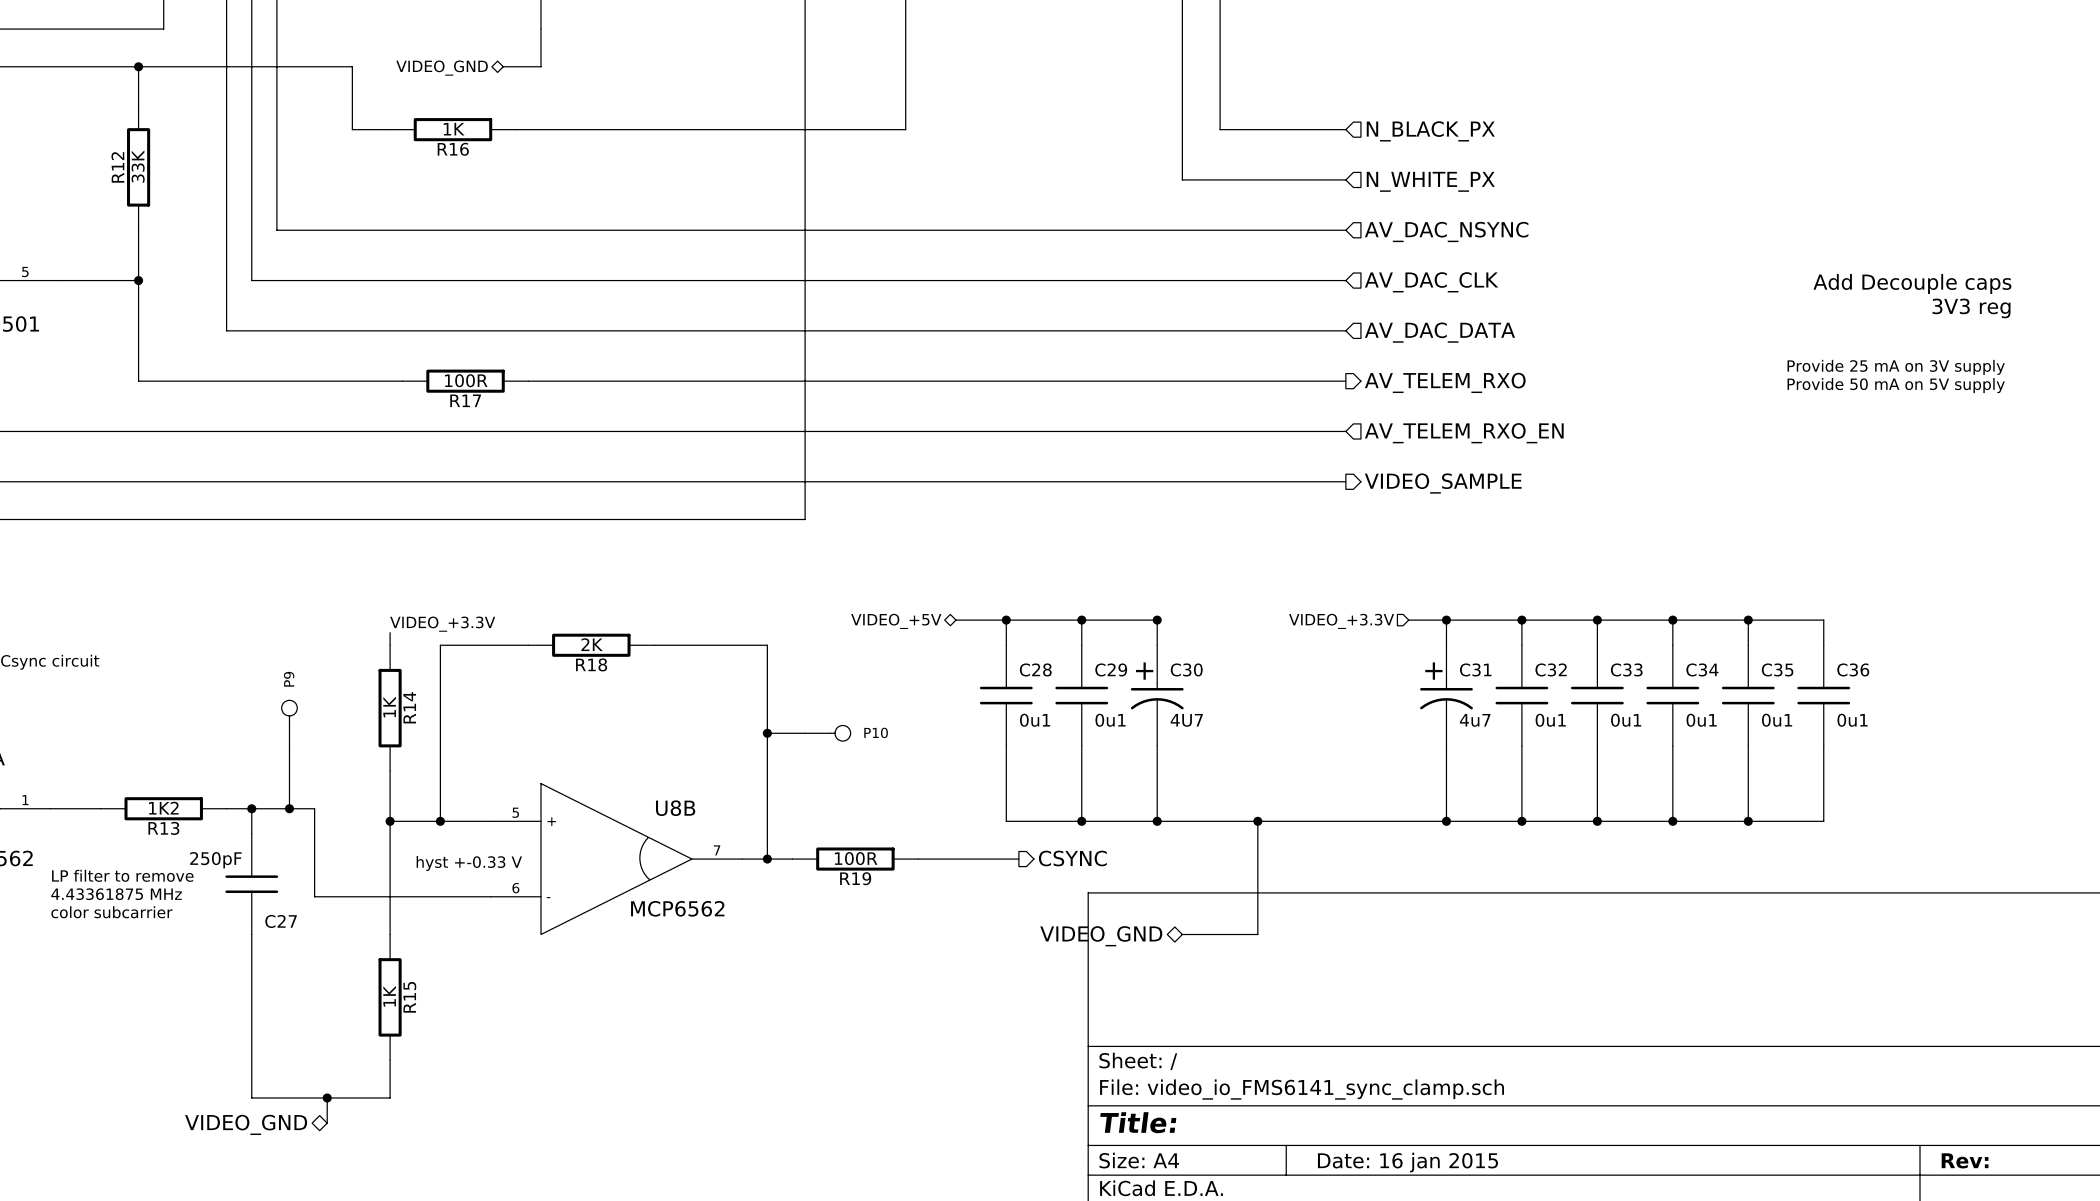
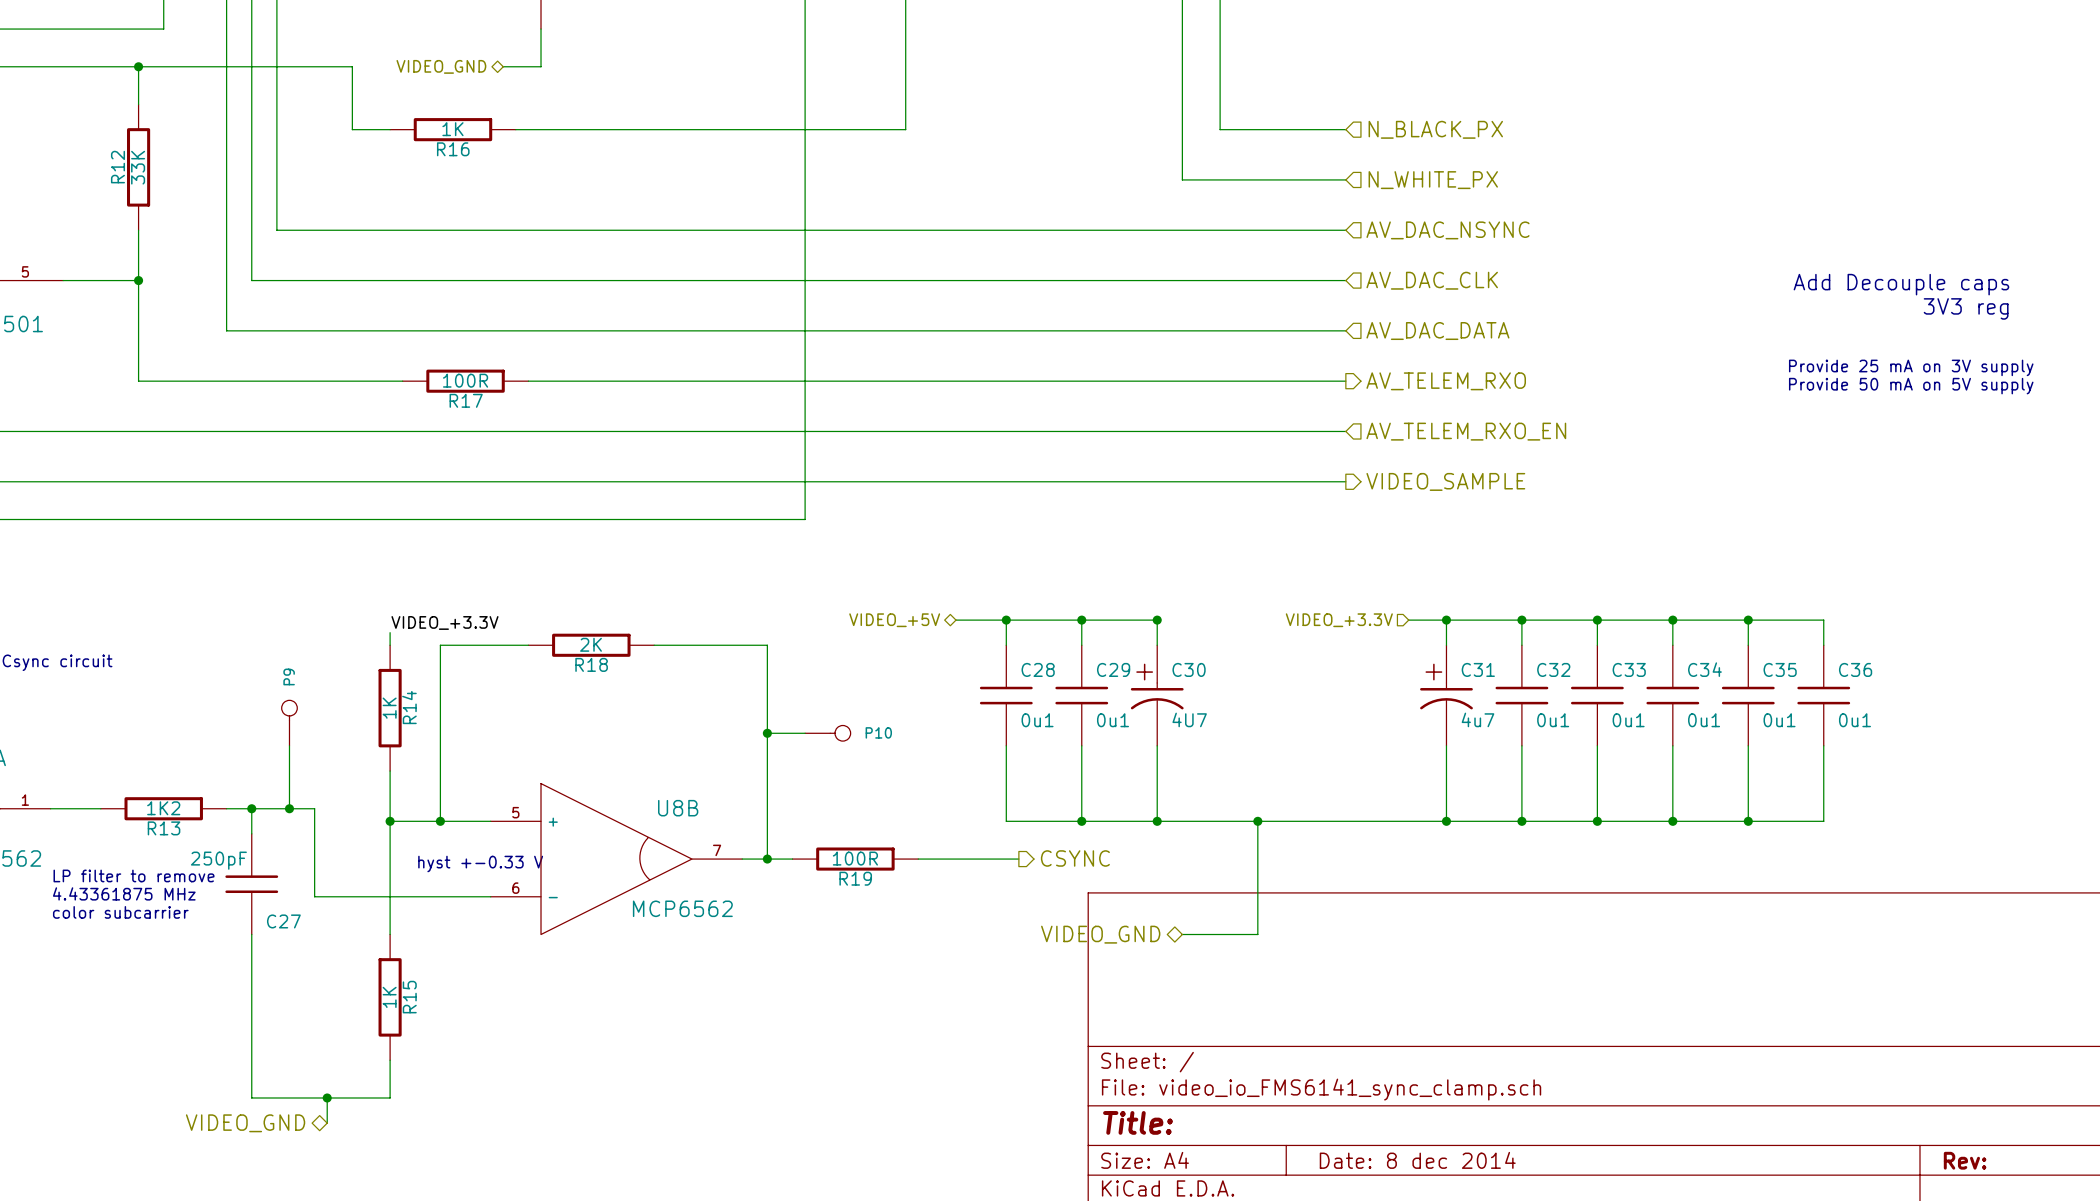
title block: Date: 16 jan 2015 (1407, 1162) -> Date: 8 dec 2014 (1417, 1160)

